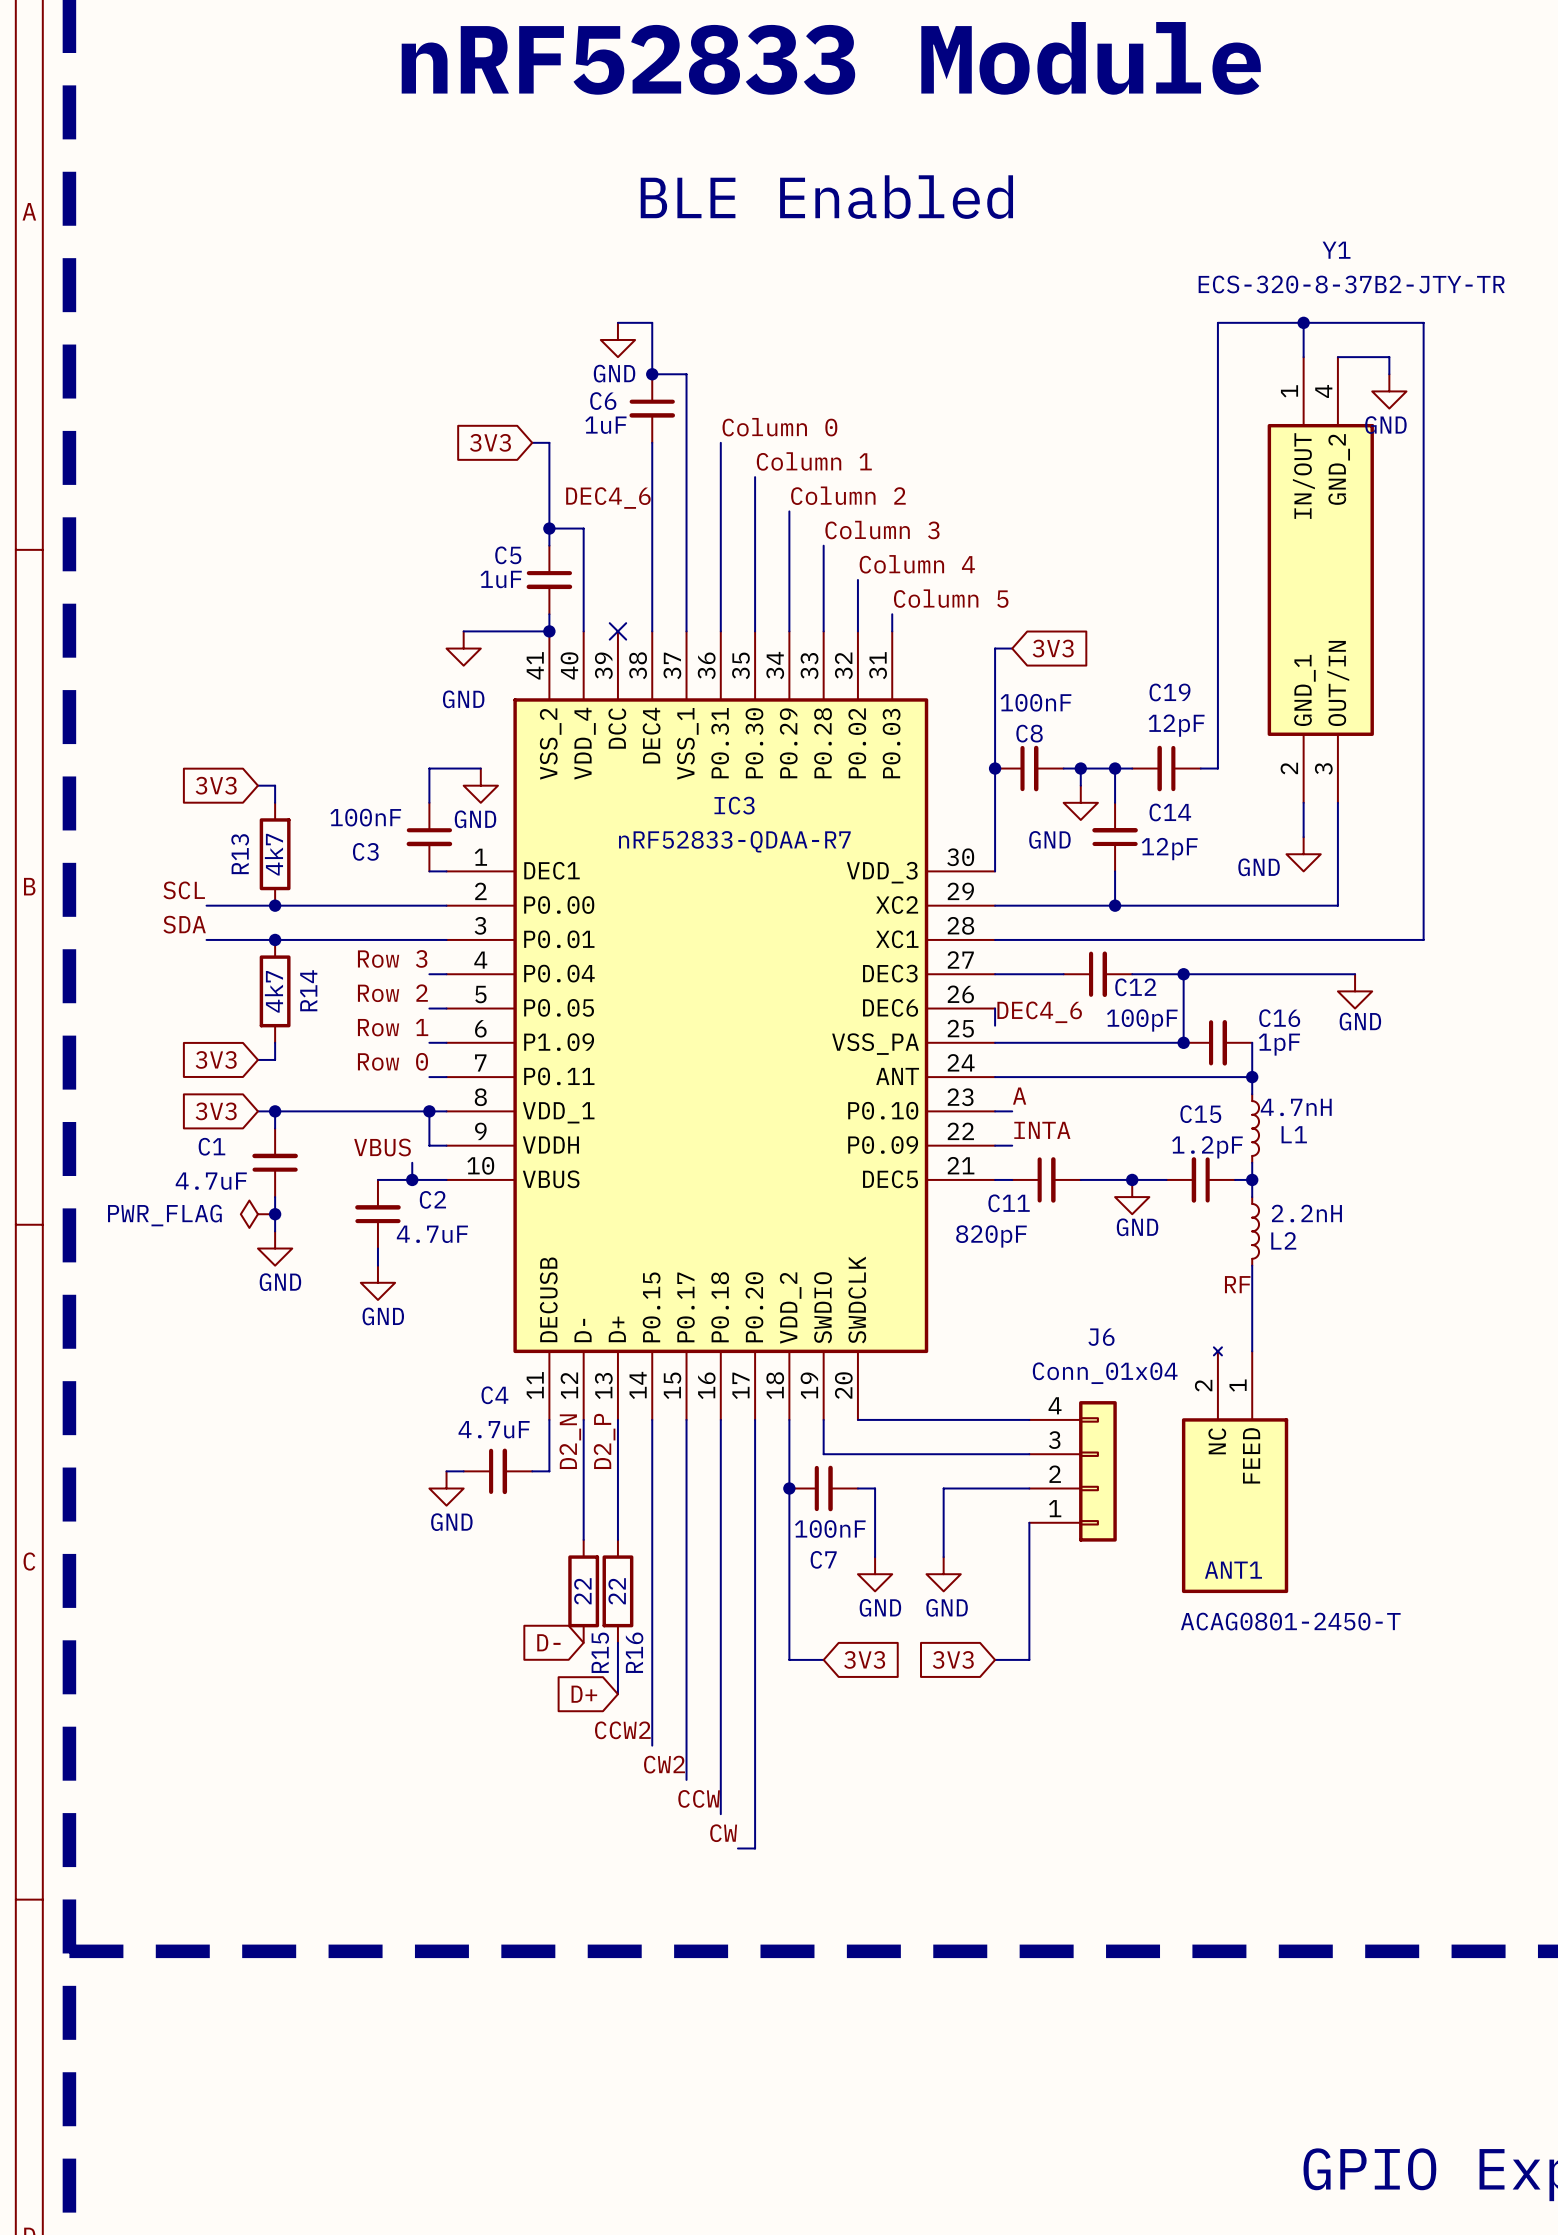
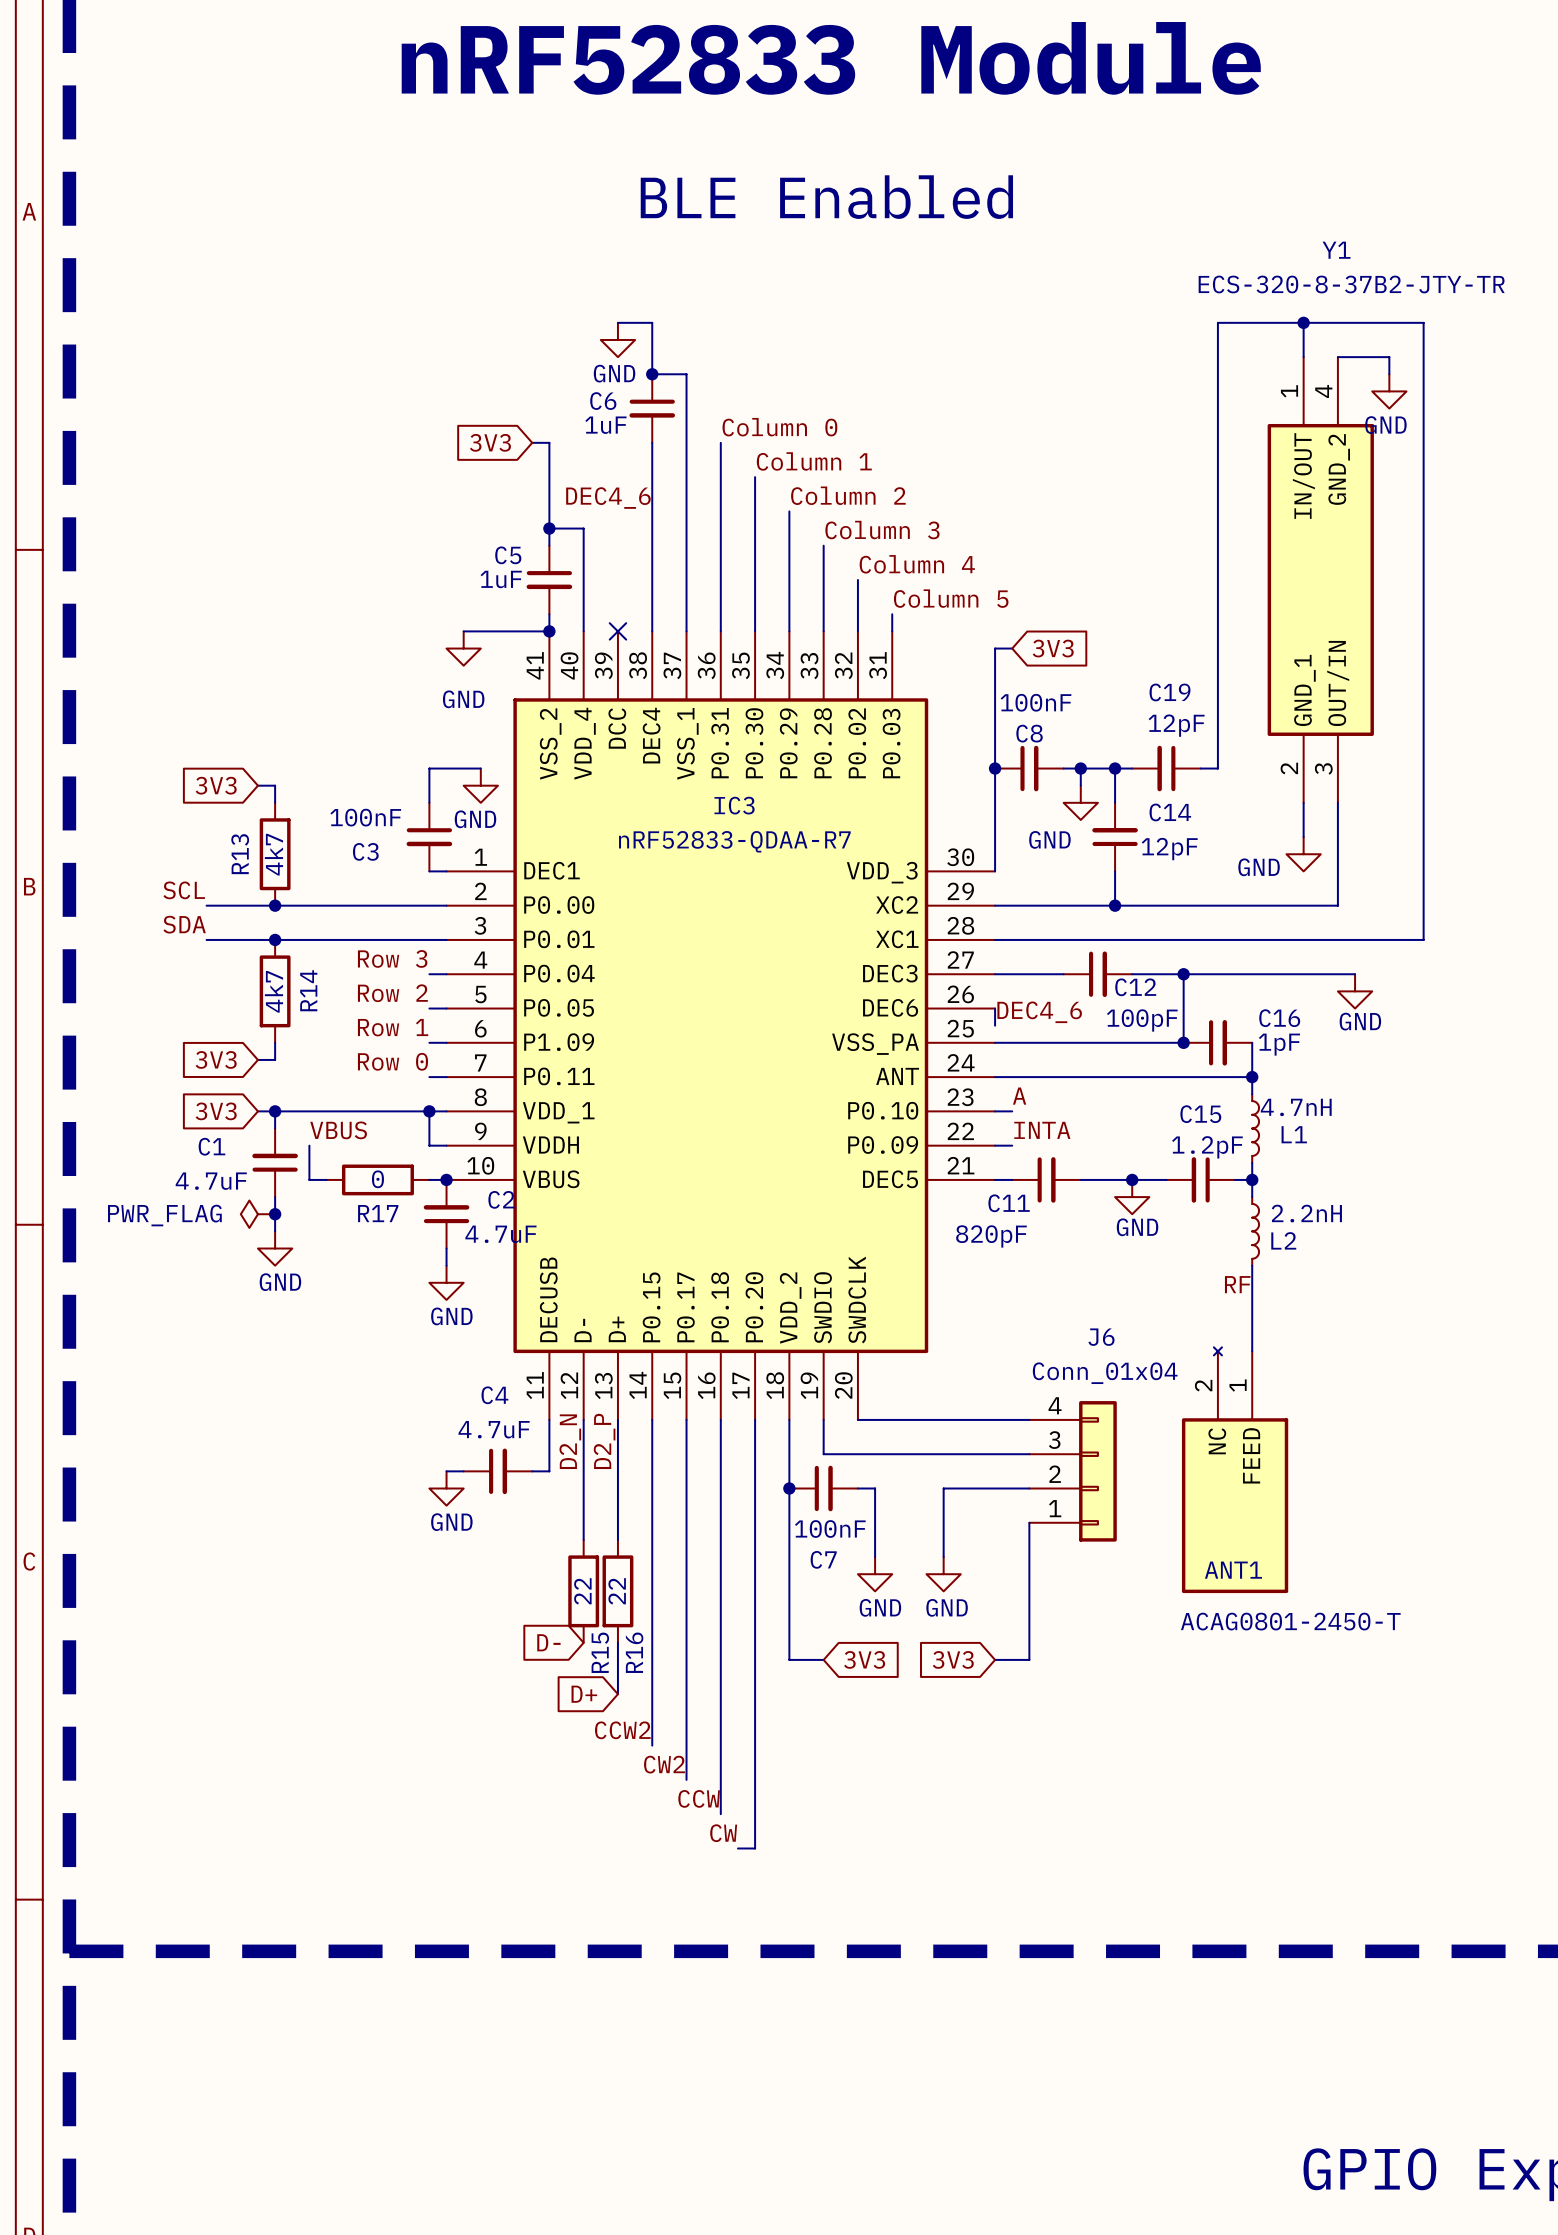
wire: none -> (309, 1145) (309, 1179) (326, 1179)
label position: VBUS (382, 1147) -> VBUS (338, 1130)
wire: (377, 1179) (429, 1179) -> none
R17: none -> 0 (377, 1179)
junction position: (412, 1179) -> (446, 1179)
C2 position: (377, 1214) -> (446, 1214)
wire: (377, 1248) (377, 1265) -> (446, 1248) (446, 1265)
power symbol position: GND (377, 1282) -> GND (446, 1282)

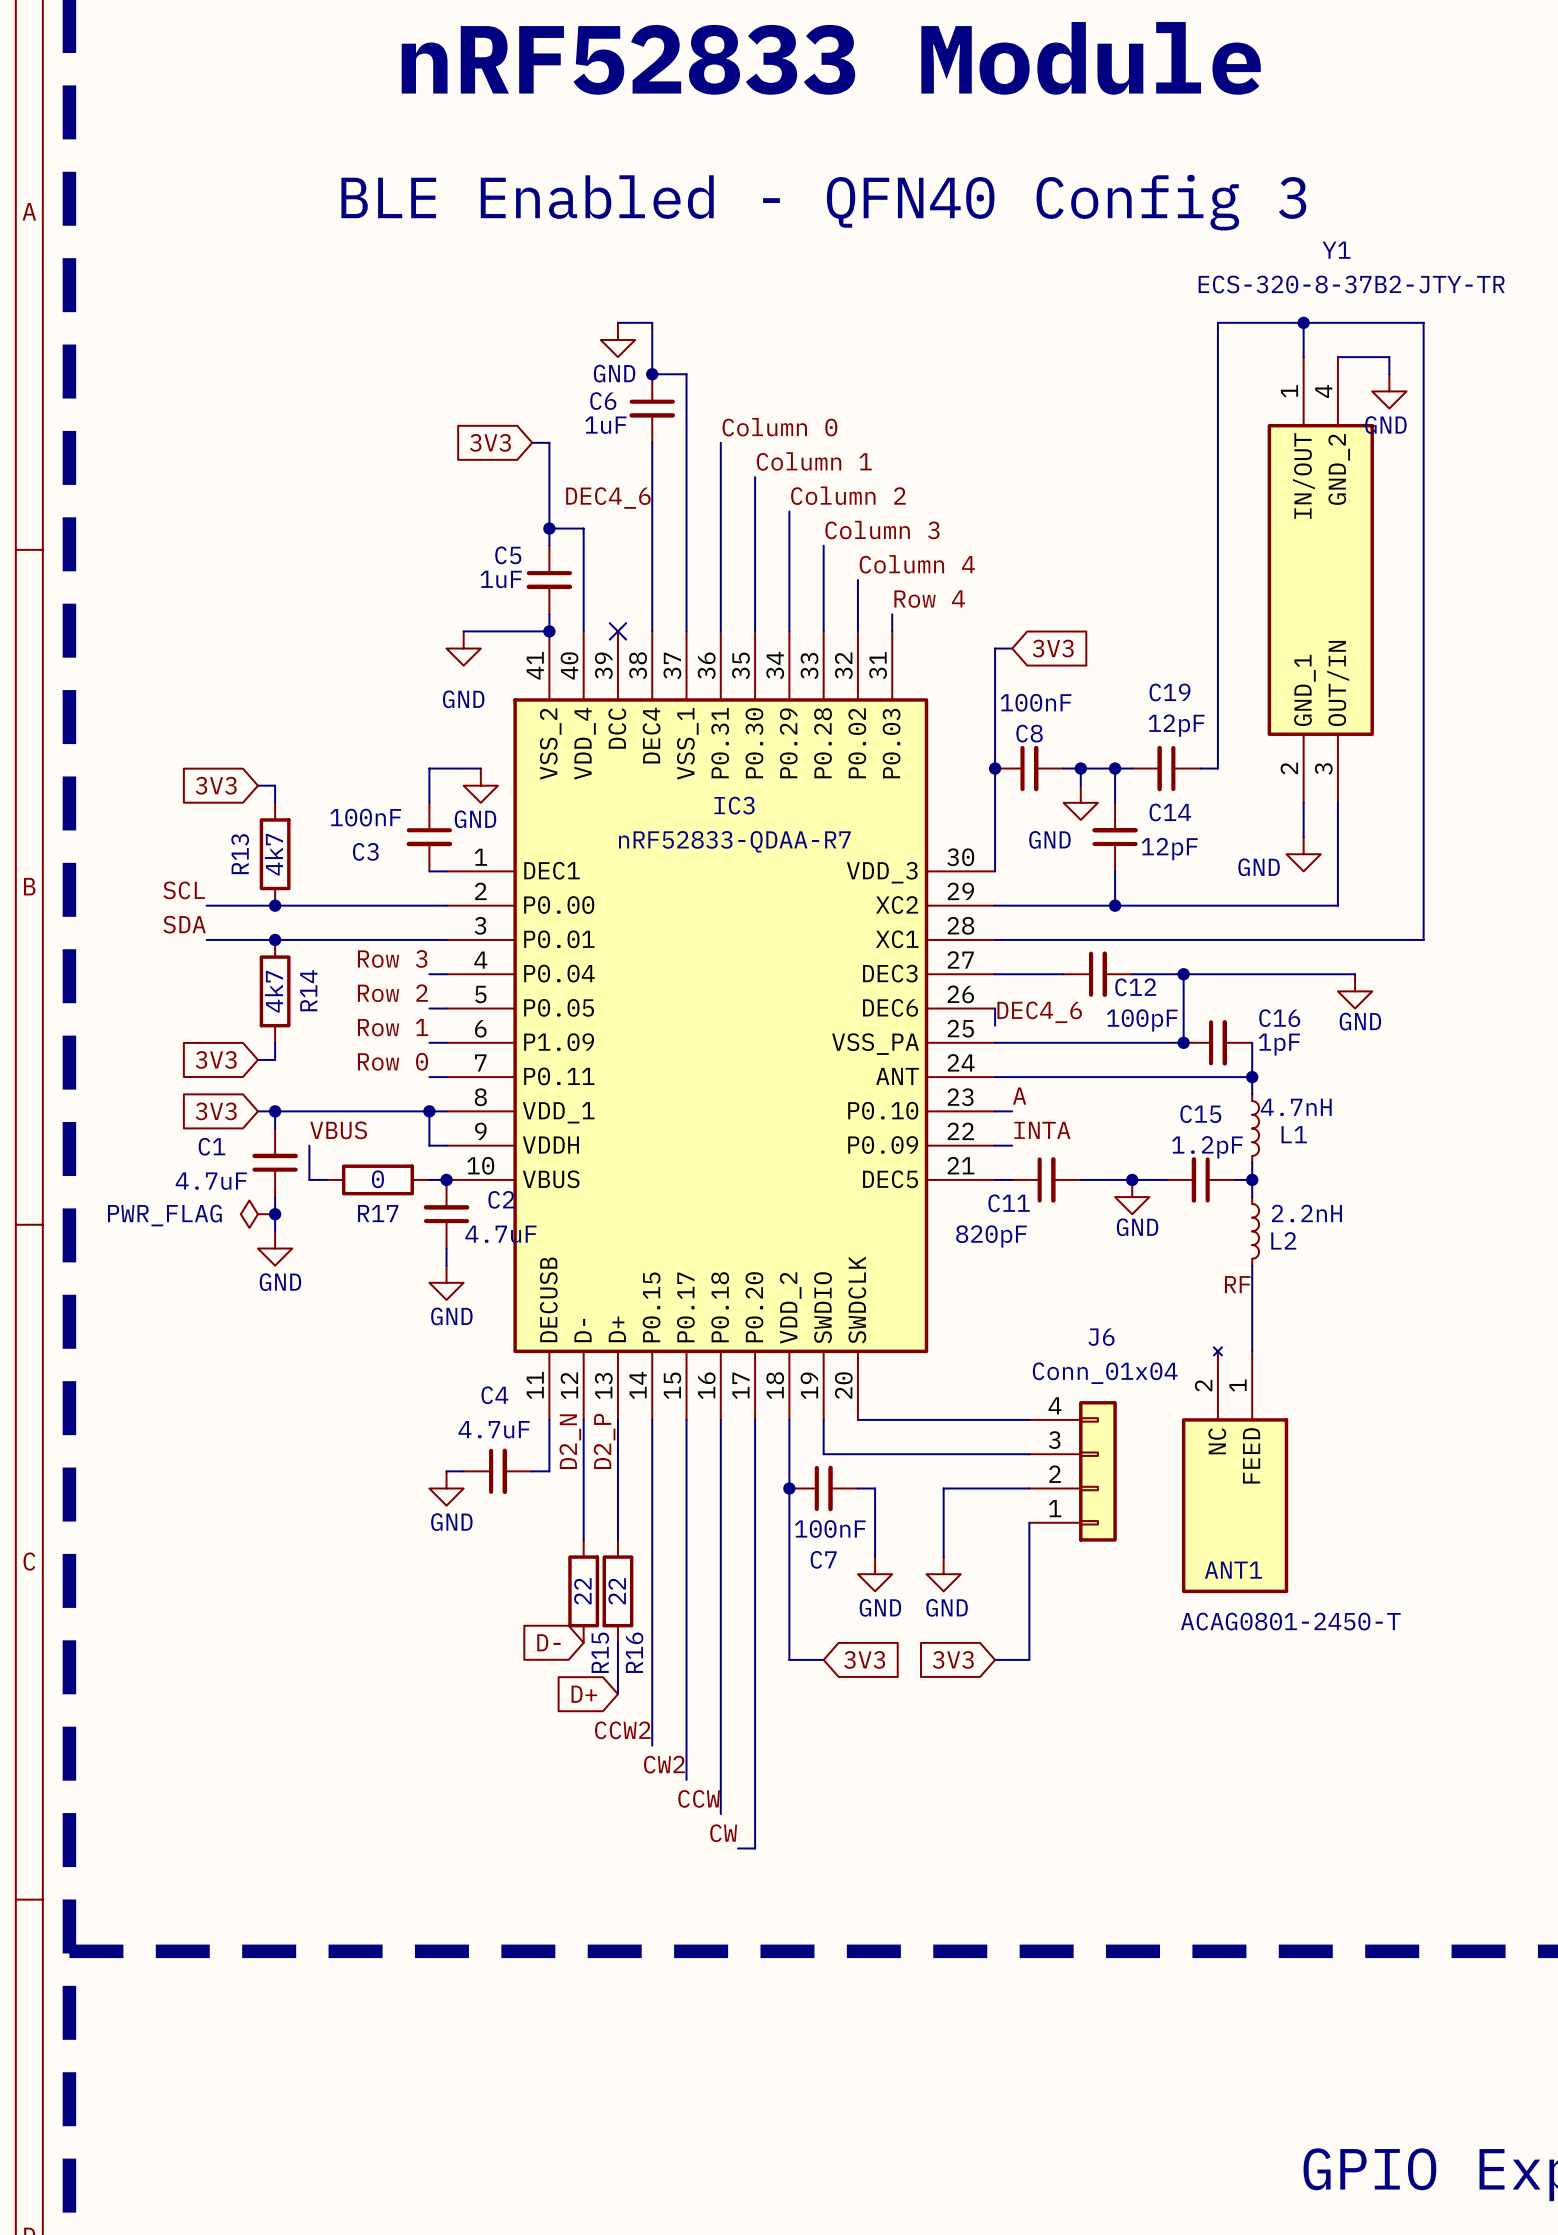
text: BLE Enabled (826, 197) -> BLE Enabled - QFN40 Config 3 (823, 202)
label: Column 5 (951, 598) -> Row 4 (929, 599)

